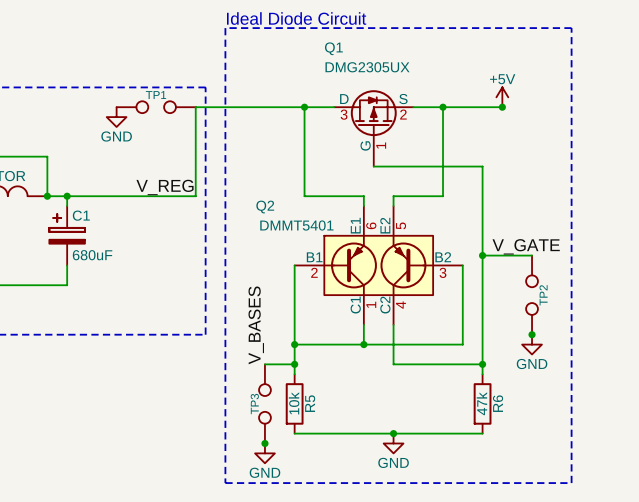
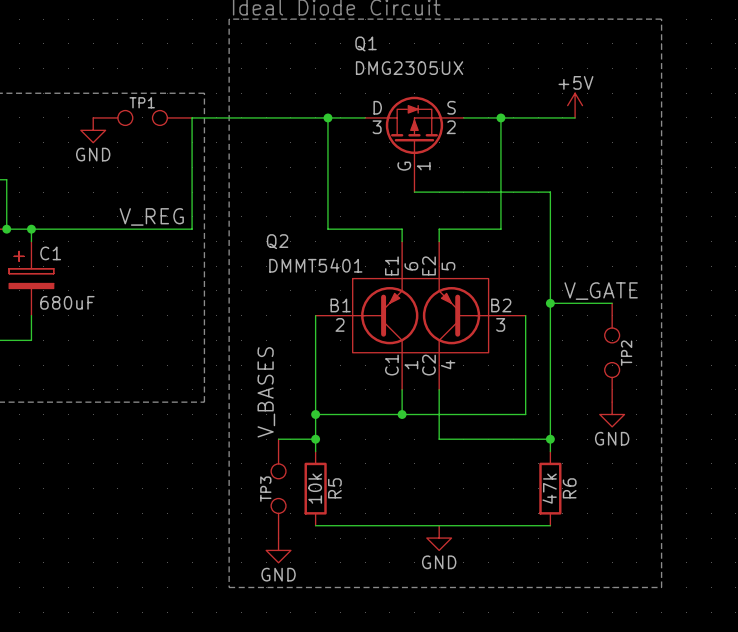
junction: (502, 107) -> none
junction: (532, 334) -> none
junction: (393, 433) -> none
junction: (264, 443) -> none

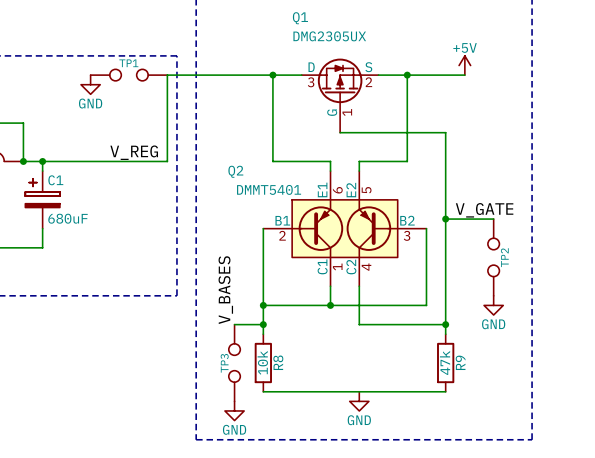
R5 name: R5 (334, 488) -> R8 (278, 362)
R6 name: R6 (569, 488) -> R9 (460, 362)

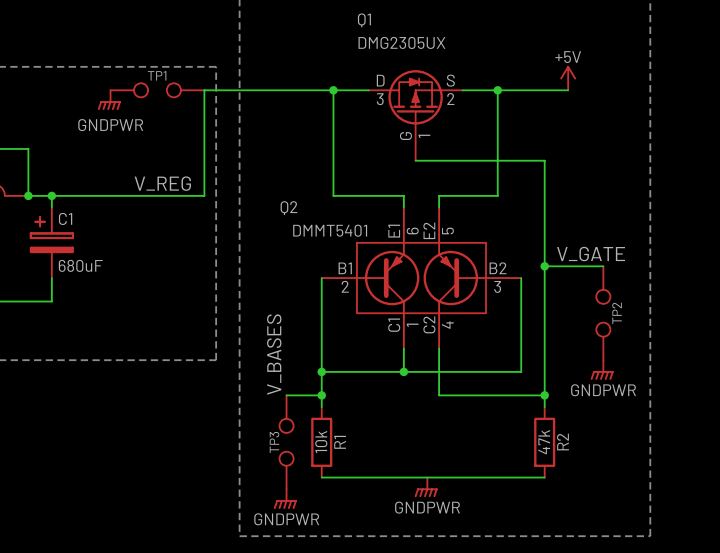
power symbol: GND (90, 84) -> GNDPWR (109, 100)
power symbol: GND (493, 305) -> GNDPWR (602, 370)
R8 name: R8 (278, 362) -> R1 (340, 442)
R9 name: R9 (460, 362) -> R2 (562, 442)
power symbol: none -> GNDPWR (426, 487)
power symbol: GND (359, 401) -> none
power symbol: GND (234, 410) -> GNDPWR (285, 499)

